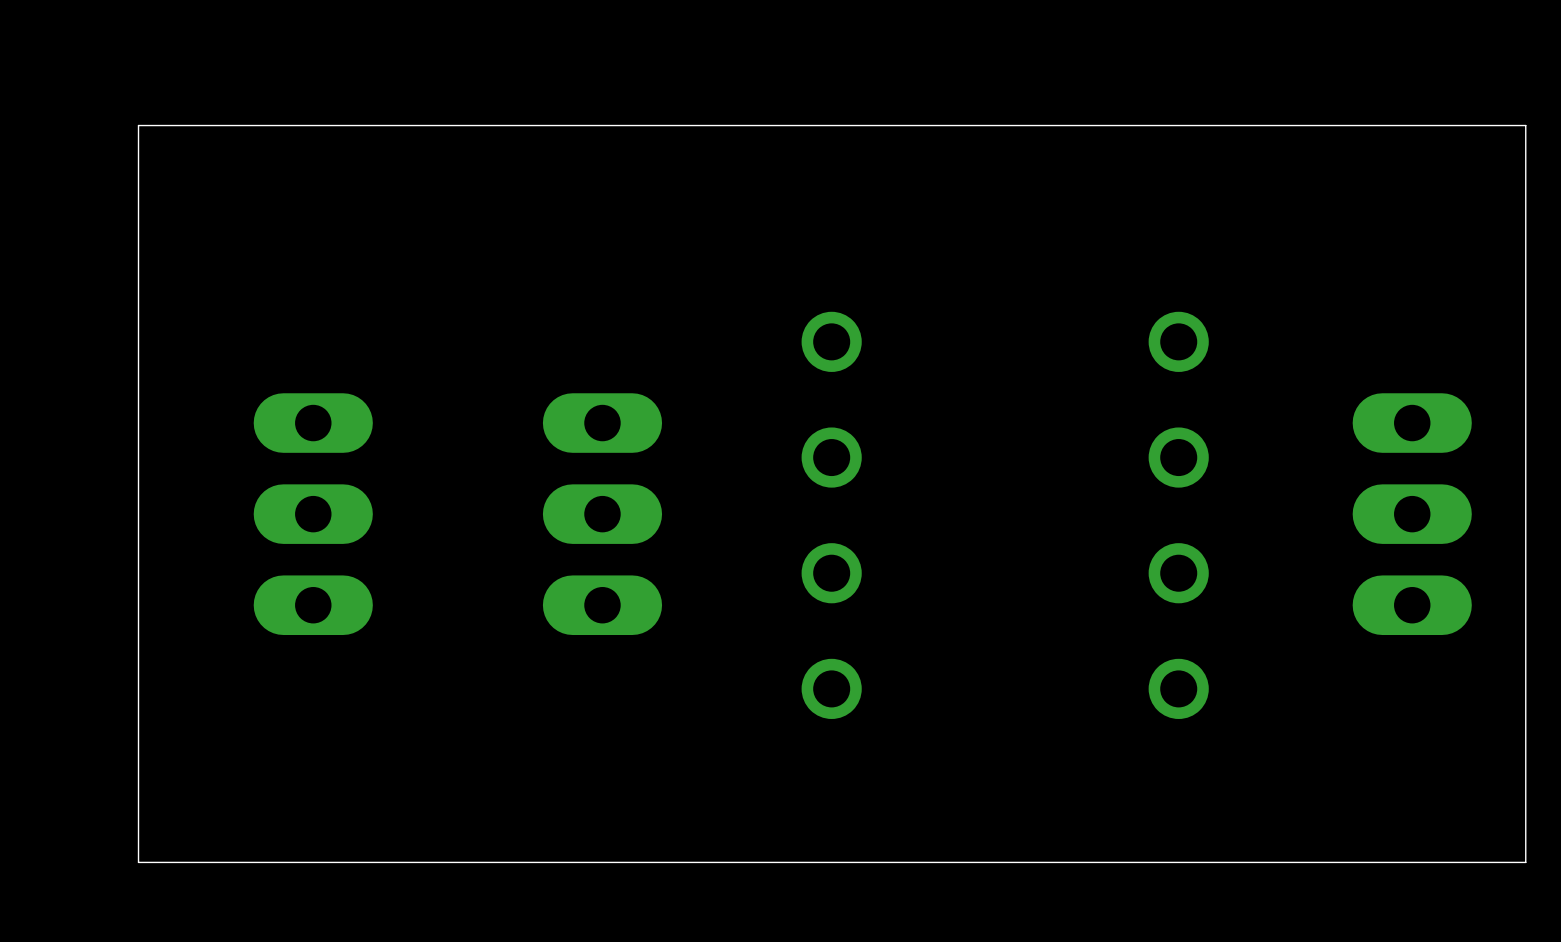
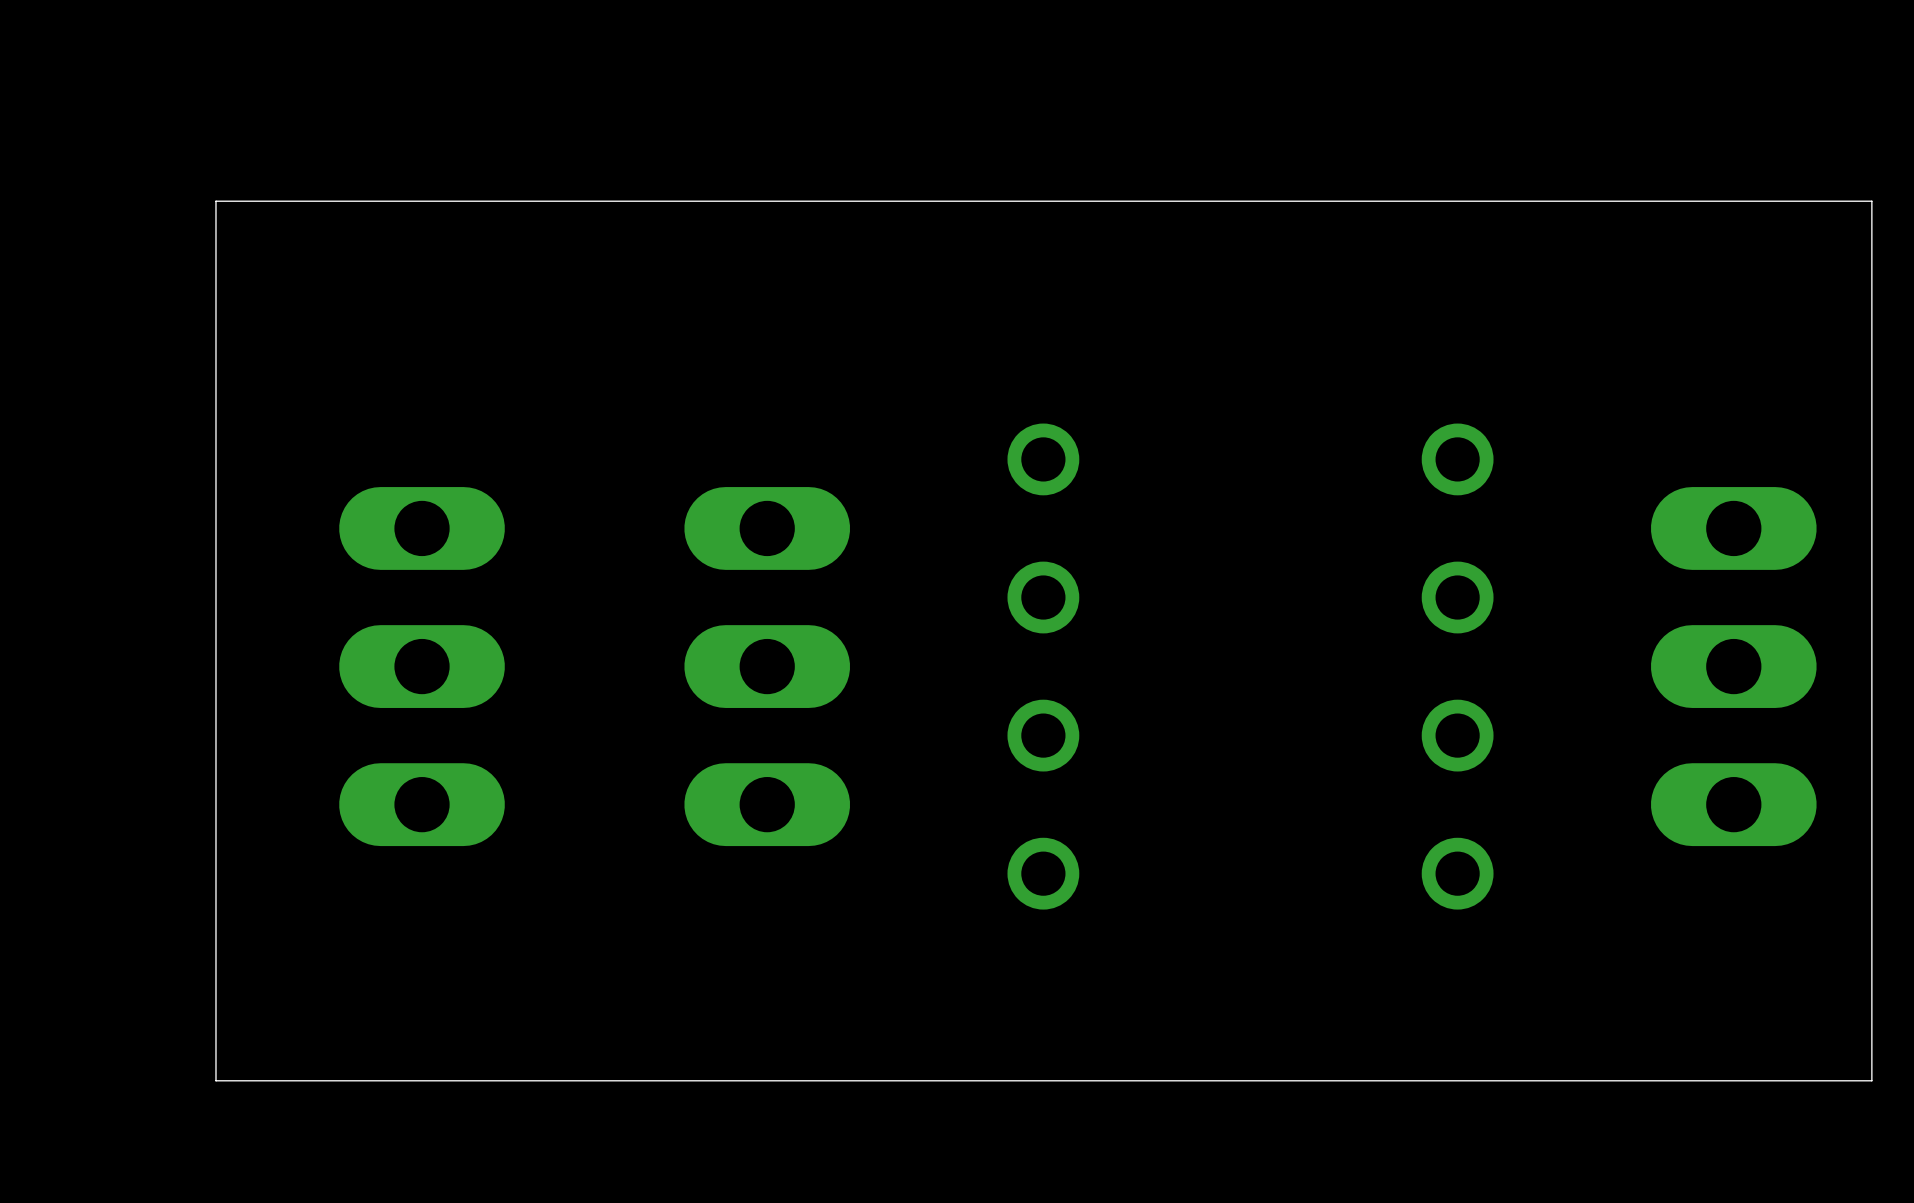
part footprint: [253, 393, 373, 636] -> [339, 487, 505, 847]
part footprint: [542, 393, 663, 636] -> [684, 487, 851, 847]
part footprint: [1352, 393, 1472, 636] -> [1650, 487, 1817, 847]

